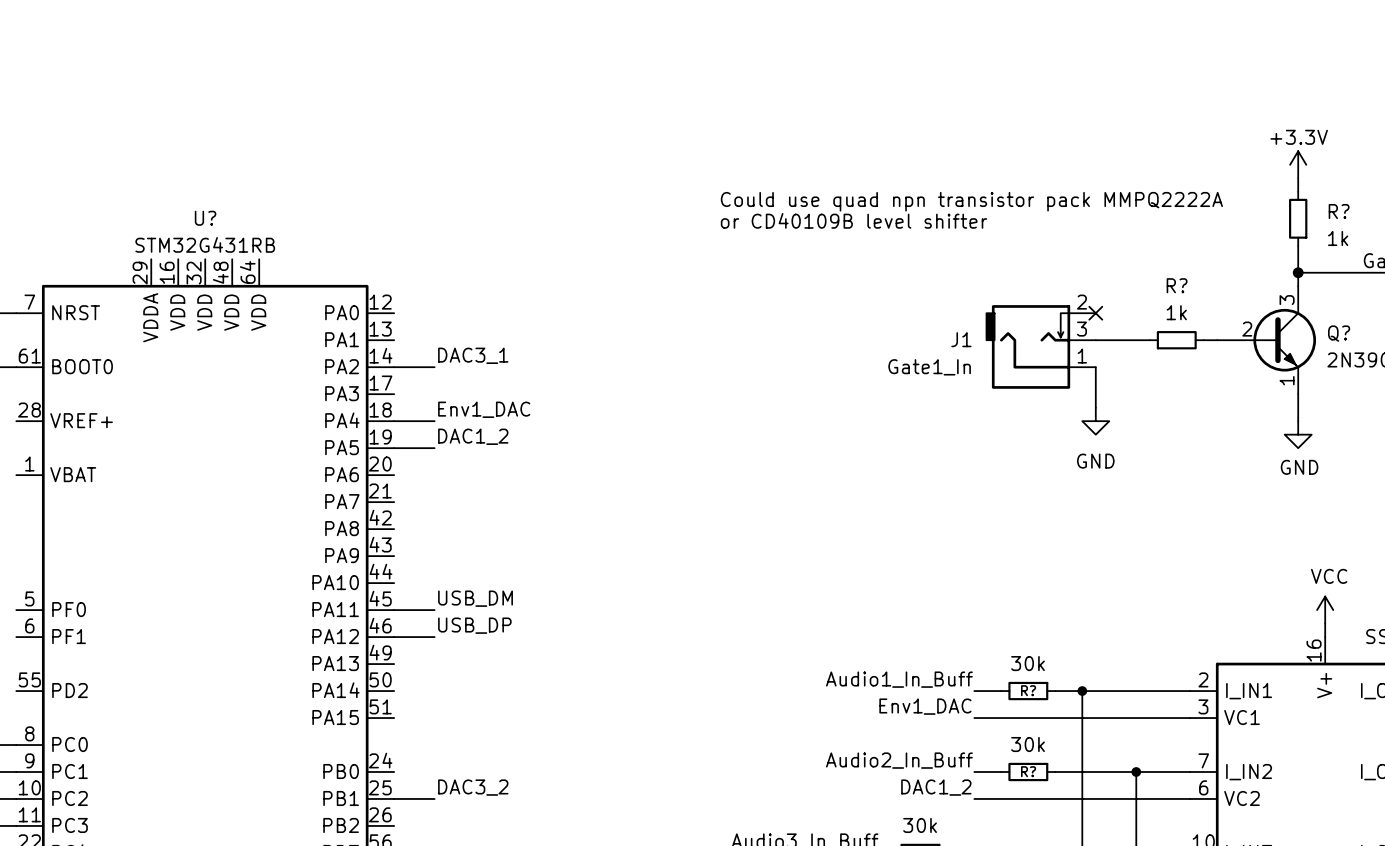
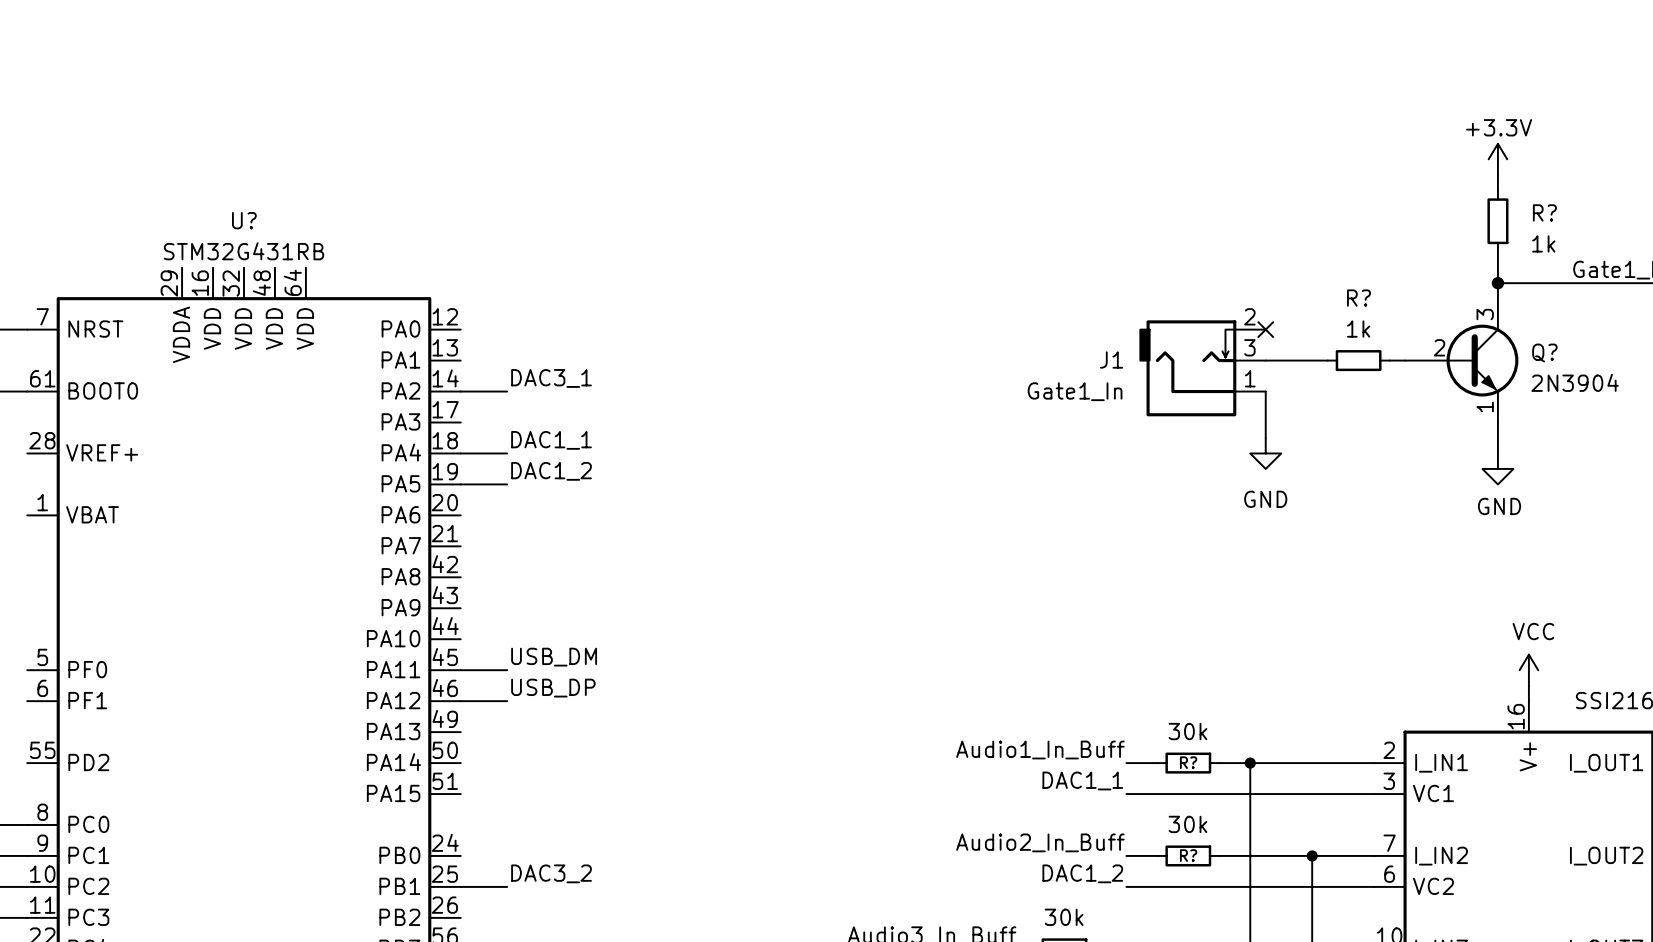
text: Could use quad npn transistor pack MMPQ2222A (971, 201) -> none
text: or CD40109B level shifter (853, 220) -> none
label: Env1_DAC (484, 409) -> DAC1_1 (551, 440)
label: Env1_DAC (925, 706) -> DAC1_1 (1082, 780)

